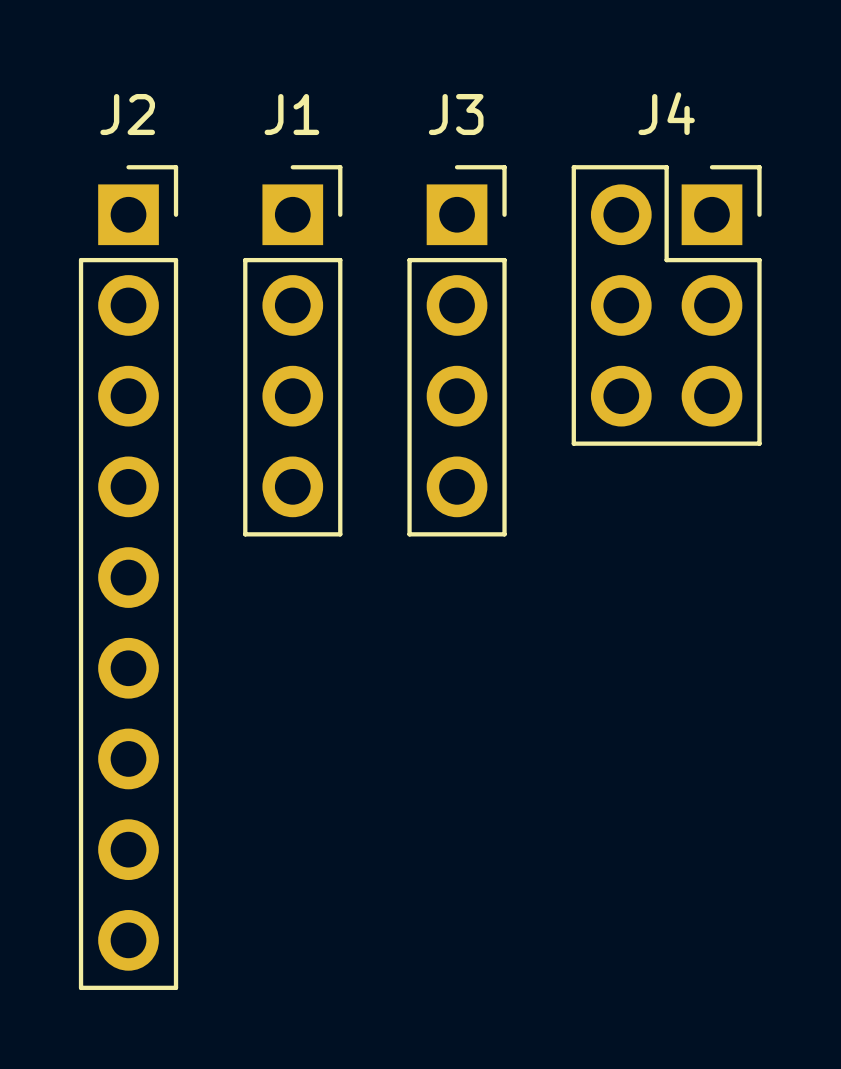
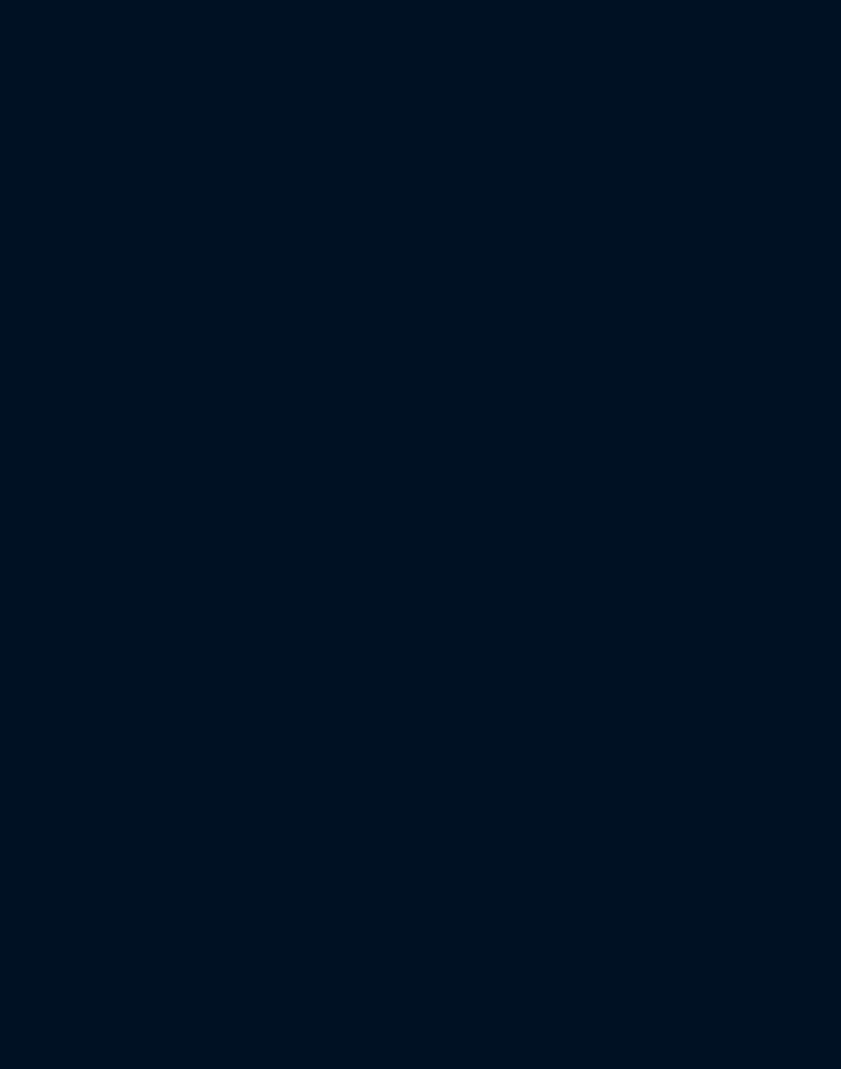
J4: (666, 305) -> none
J1: (292, 350) -> none
J3: (457, 350) -> none
J2: (128, 577) -> none

